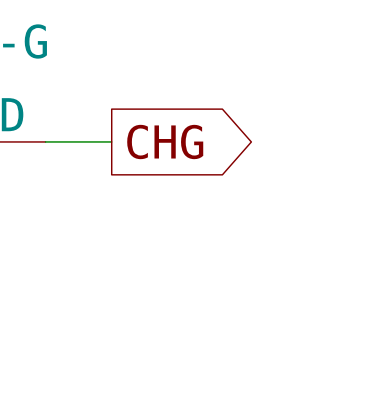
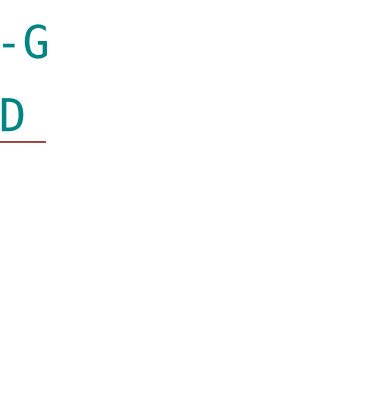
wire: (45, 141) (111, 141) -> none
global label: CHG (165, 142) -> none

